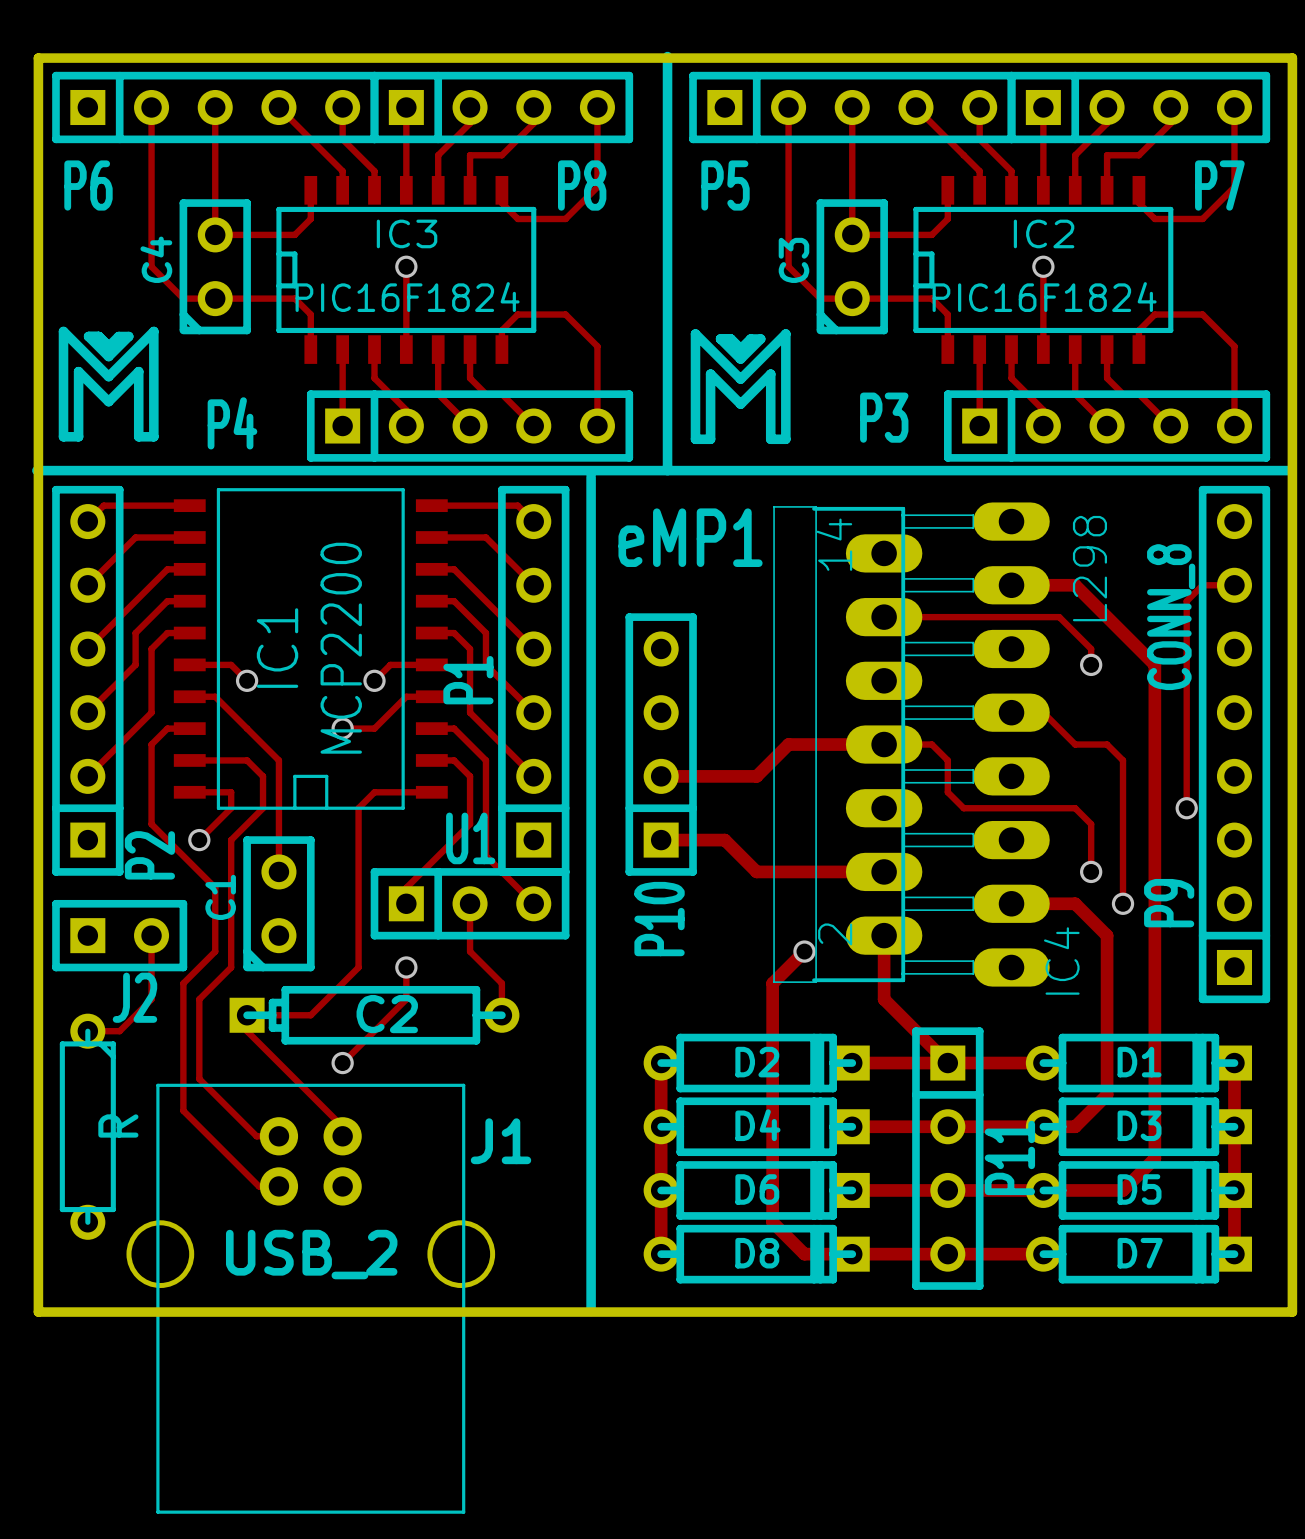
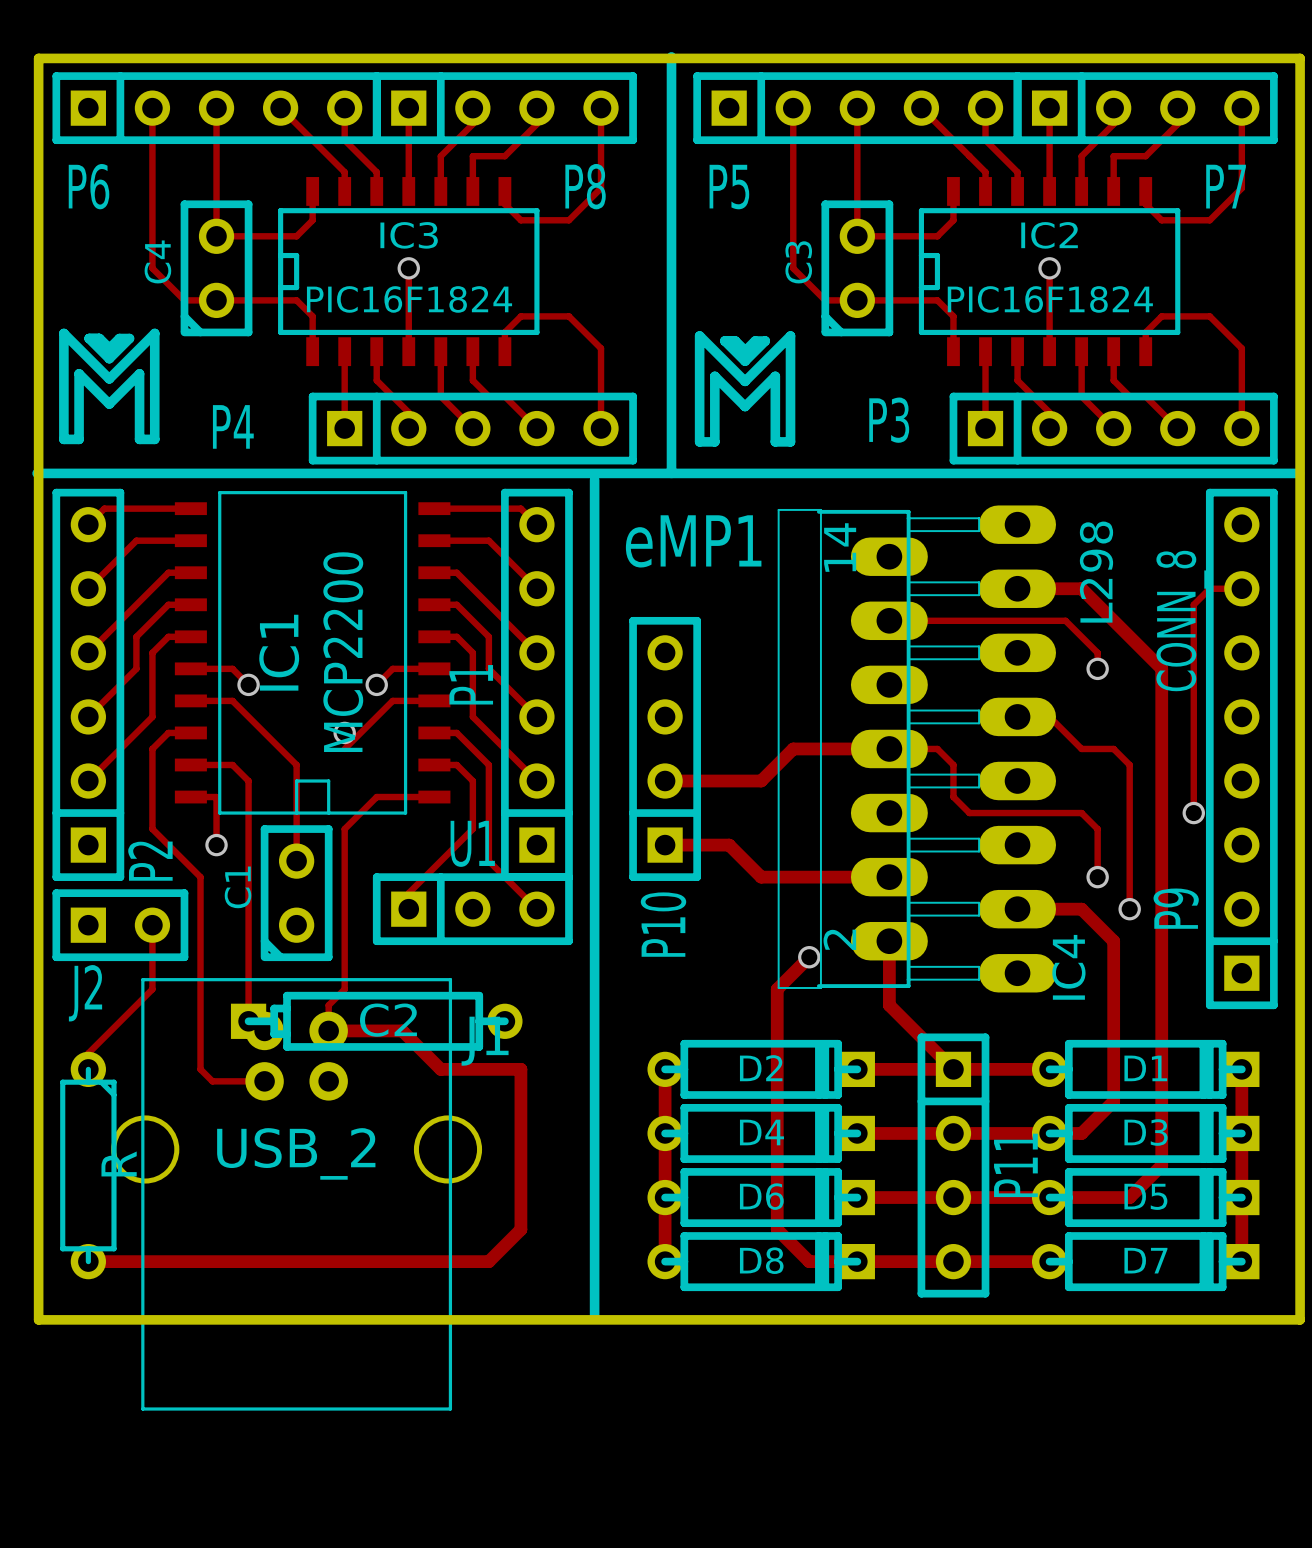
track: (215, 696) (278, 760) (278, 871) -> (216, 700) (232, 700) (296, 764) (296, 861)
track: (406, 696) (374, 728) (342, 728) -> (408, 700) (392, 700) (344, 748)
track: (231, 760) (247, 760) (263, 776) (263, 808) (231, 840) (231, 967) (199, 999) -> (232, 764) (248, 781) (248, 1014) (264, 1030)
track: (215, 792) (231, 792) (231, 808) (199, 840) -> (216, 797) (216, 845)
track: (358, 808) (358, 967) (342, 983) -> (360, 813) (344, 829) (344, 989)
via position: (199, 840) -> (216, 845)
track: (199, 871) (215, 887) (215, 951) (183, 983) (183, 1110) (259, 1186) (278, 1186) -> (200, 877) (200, 1005)
C1 position: (278, 903) -> (296, 893)
track: (470, 903) (470, 951) (501, 983) (501, 1015) -> none
J2 position: (119, 935) -> (120, 925)
track: (406, 967) (406, 999) (342, 1063) -> none
via: (406, 967) -> none
track: (151, 983) (151, 999) (119, 1031) (87, 1031) -> (152, 989) (88, 1053) (88, 1069)
J2 name position: J2 (134, 997) -> J2 (85, 993)
track: (326, 999) (310, 1015) (247, 1015) (247, 1031) (342, 1126) (342, 1136) -> (328, 1005) (328, 1030) (402, 1030) (440, 1069) (520, 1069) (520, 1229) (488, 1261) (88, 1261)
track: (199, 1063) (199, 1078) (256, 1136) (278, 1136) -> (200, 1069) (212, 1081) (264, 1081)
via: (342, 1063) -> none
part position: (87, 1126) -> (88, 1165)
J1 position: (310, 1298) -> (296, 1194)

